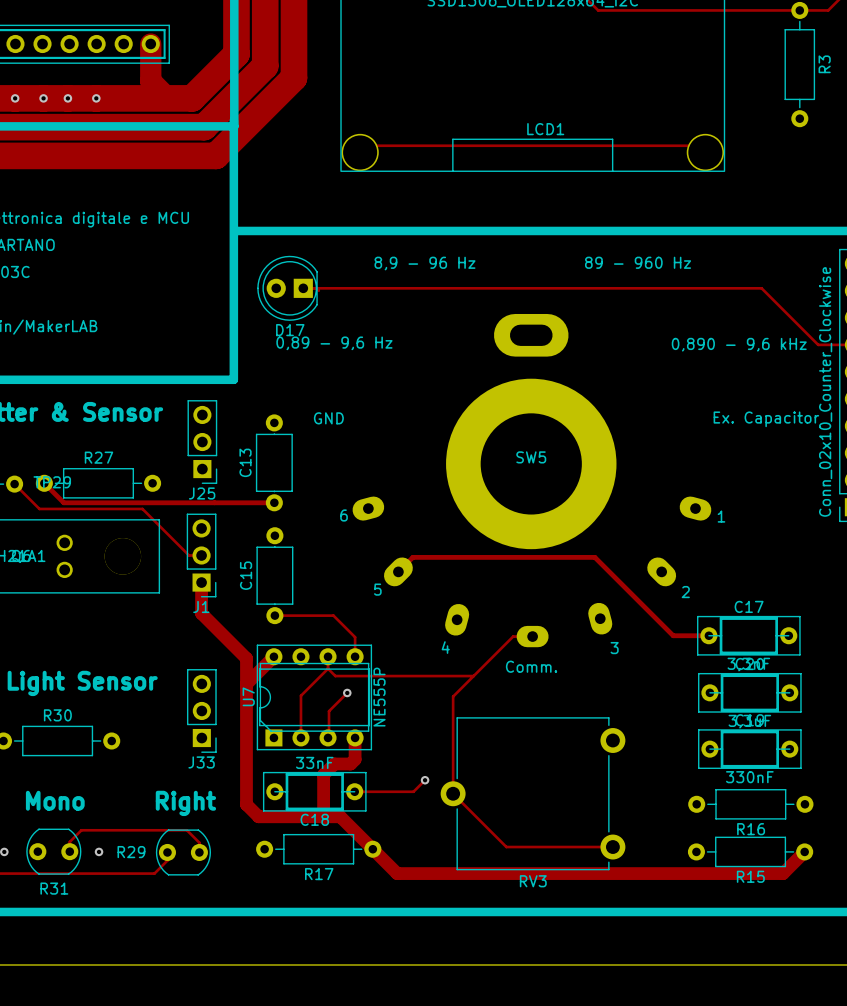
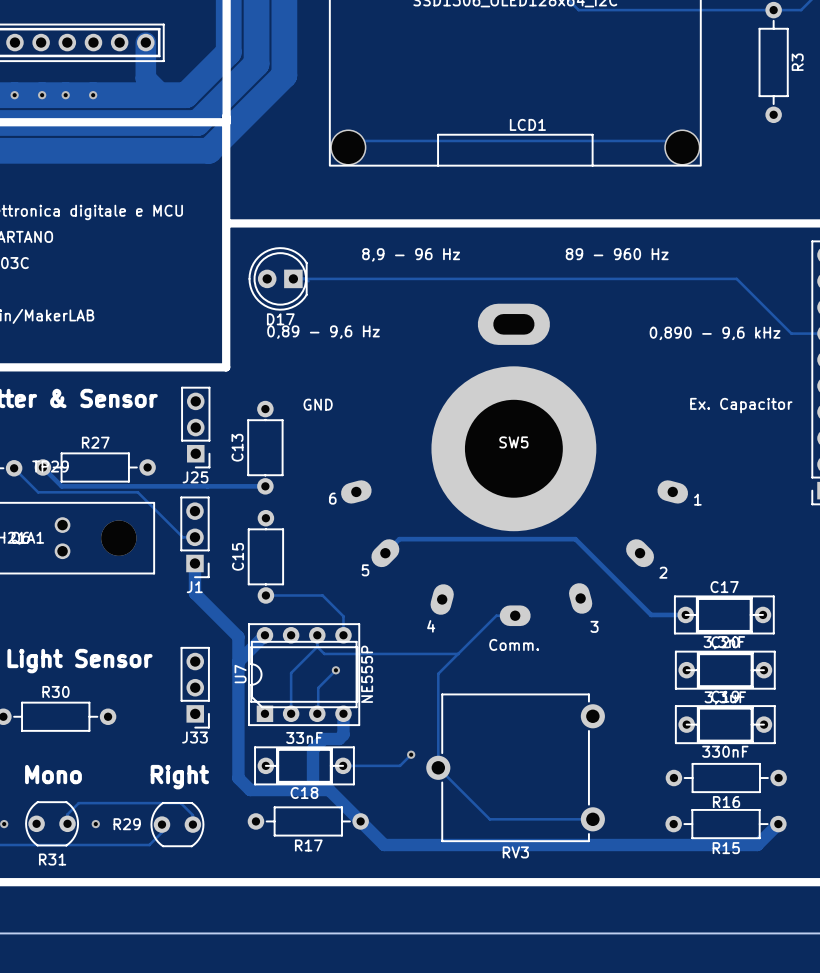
part value: Conn_02x10_Counter_Clockwise (825, 391) -> none

